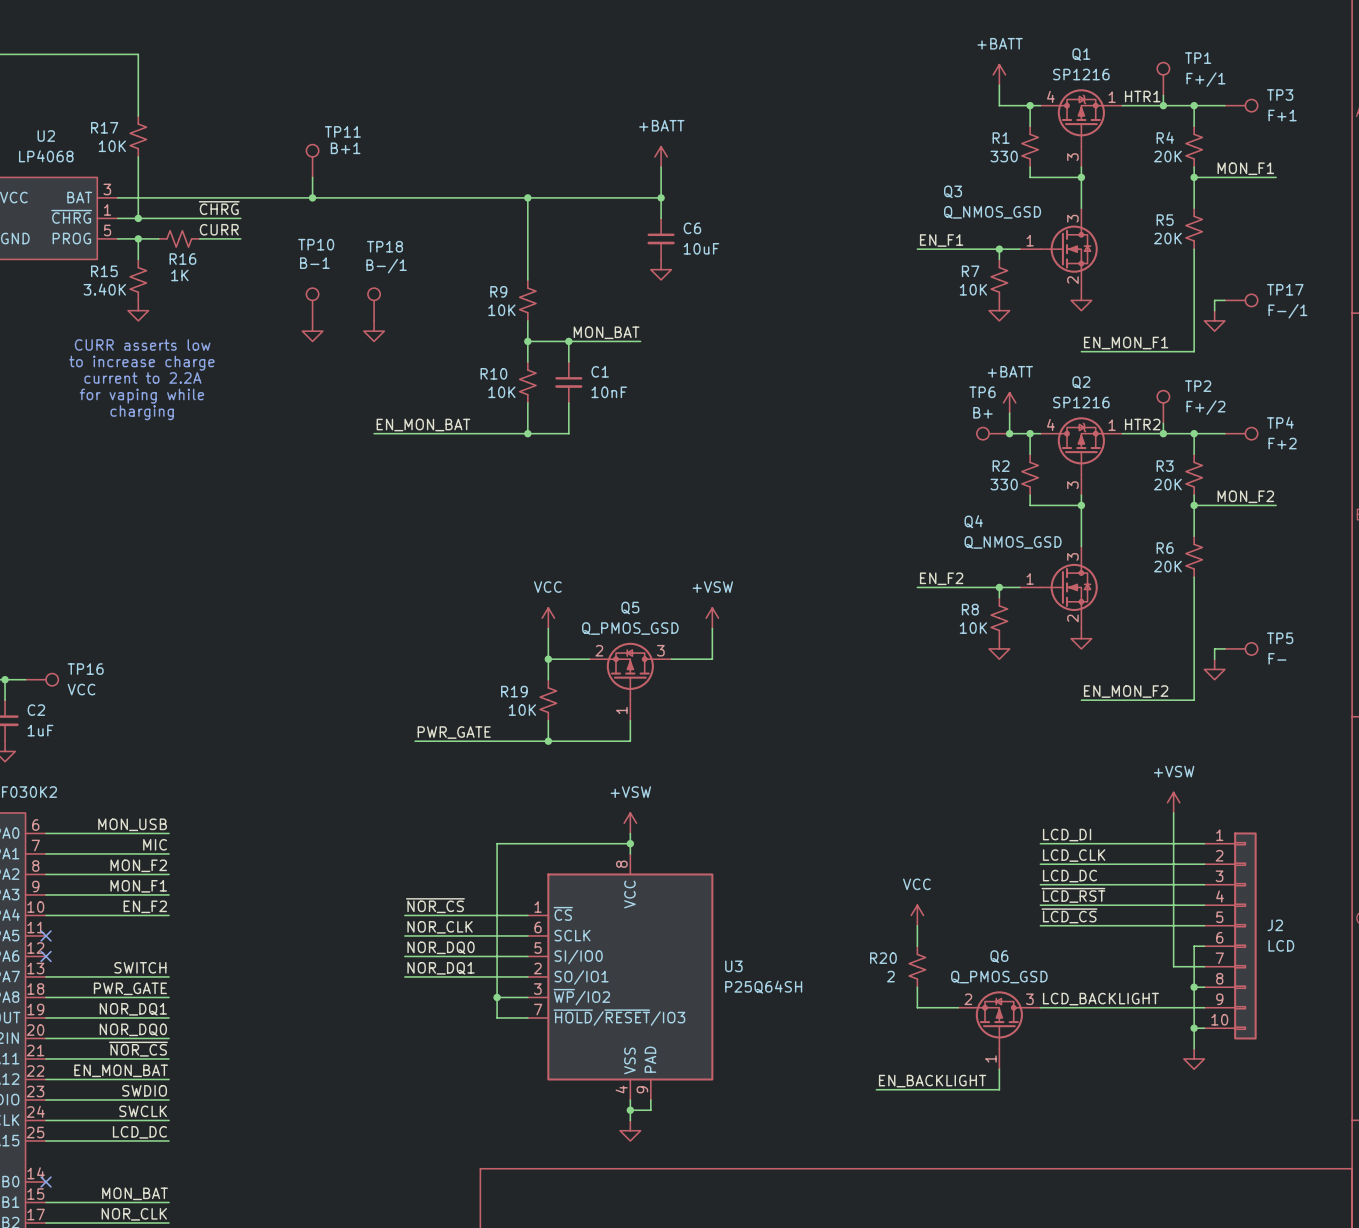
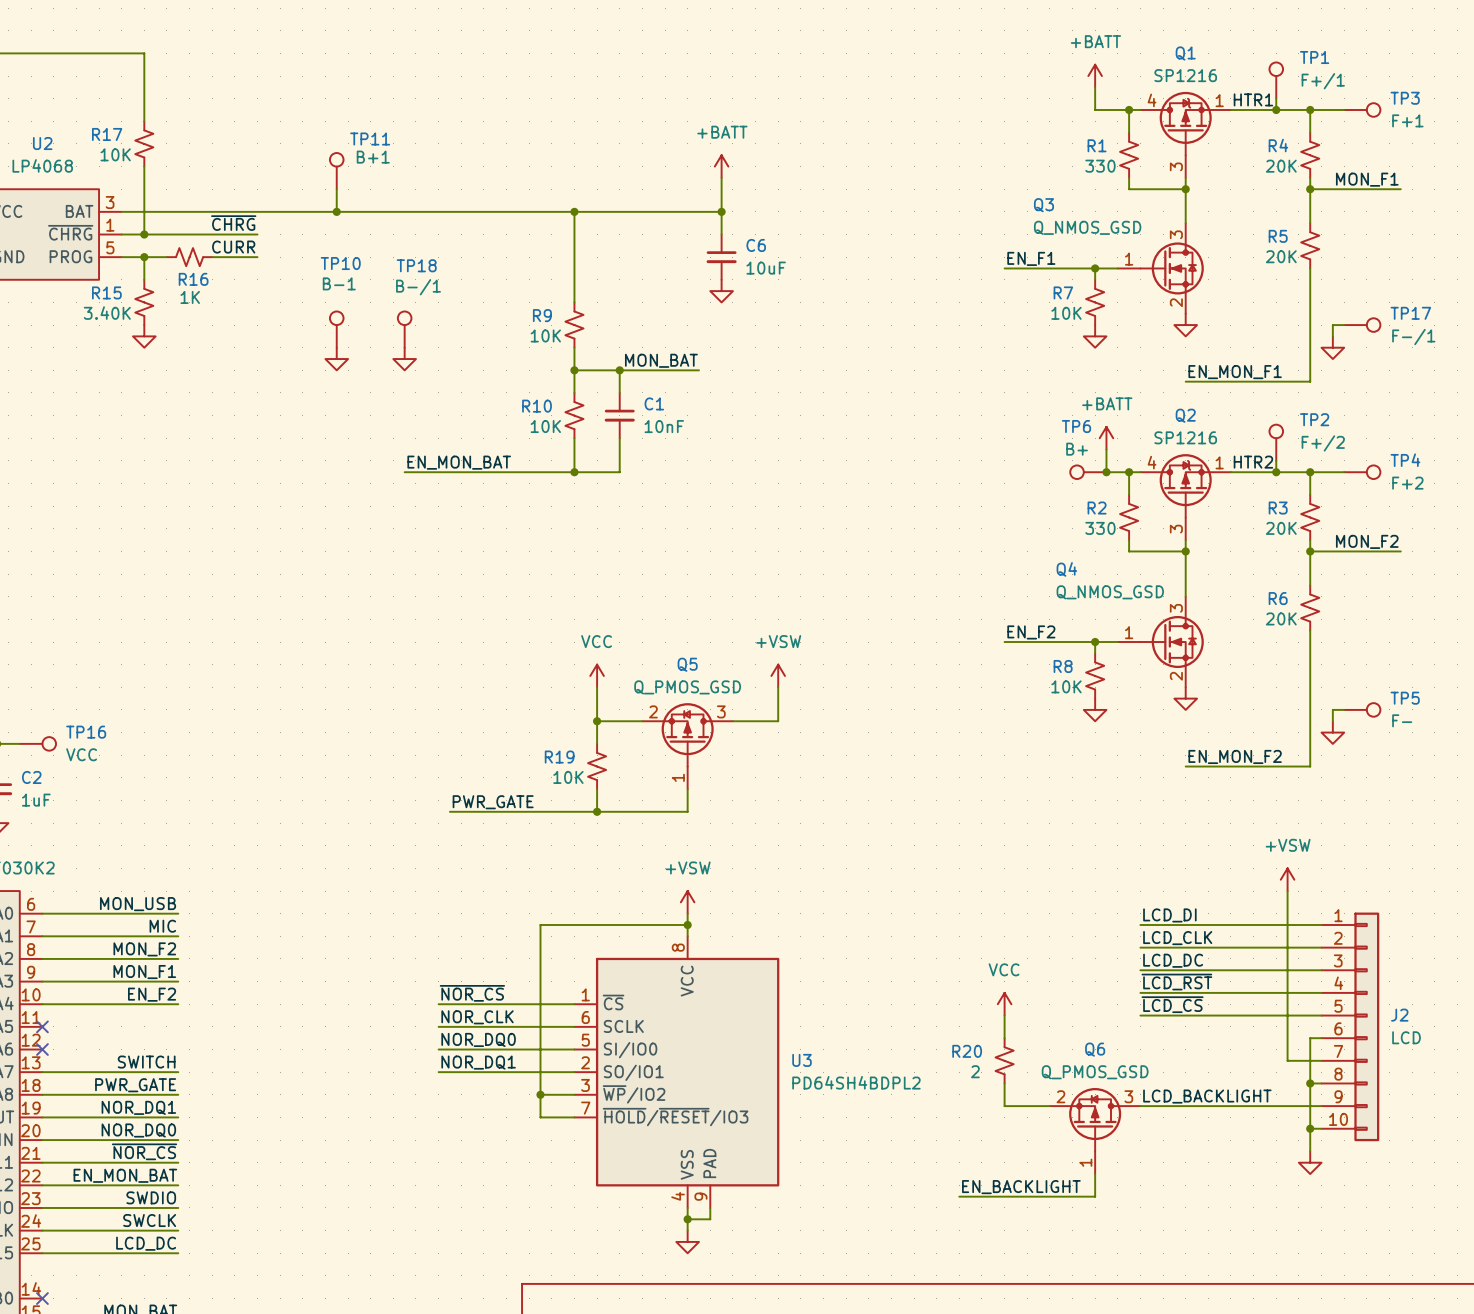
text: CURR asserts low (142, 344) -> none
text: to increase charge (141, 363) -> none
text: current to 2.2A (142, 377) -> none
text: for vaping while (141, 396) -> none
text: charging (142, 412) -> none
U3 value: P25Q64SH (763, 987) -> PD64SH4BDPL2 (856, 1082)

